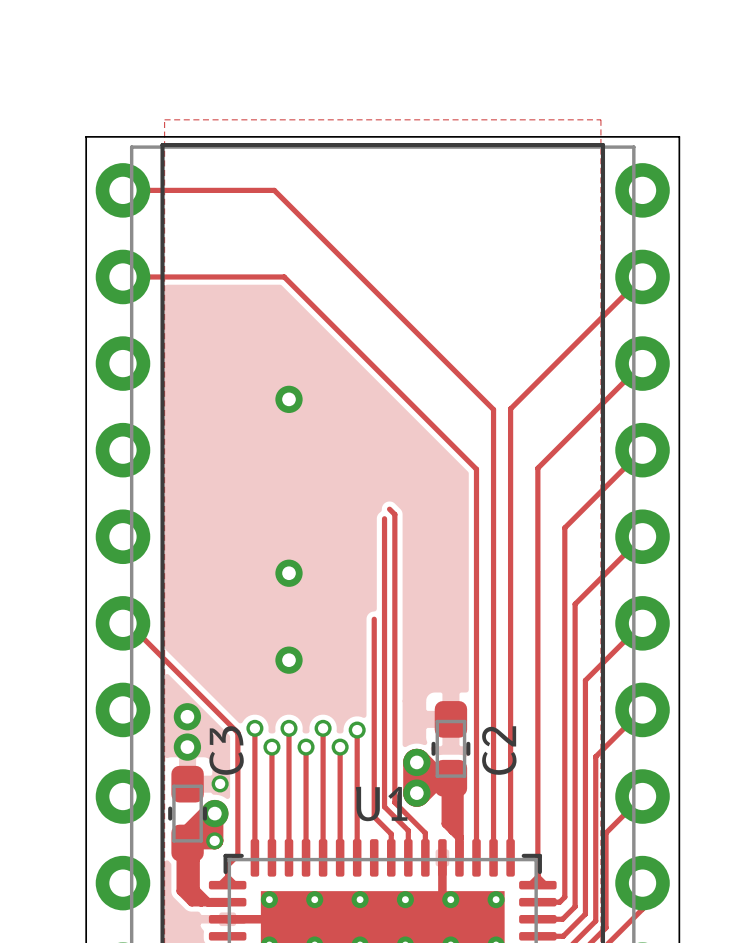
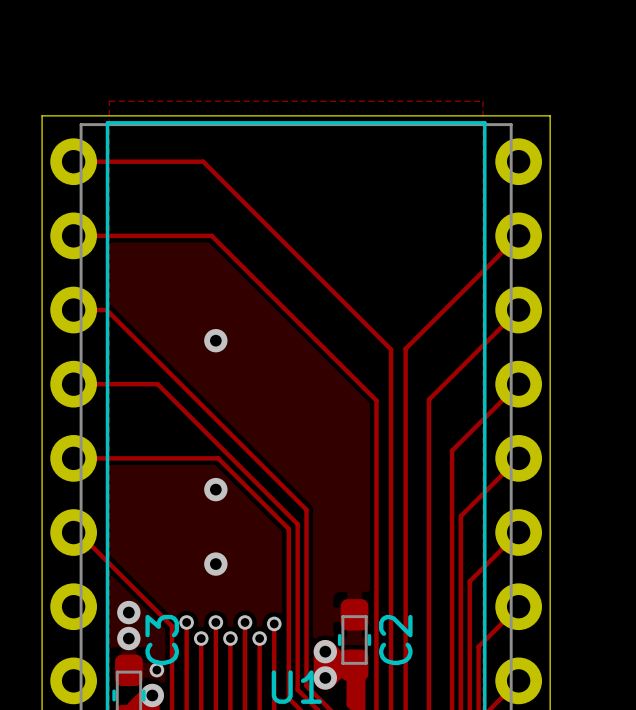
track: (389, 509) (394, 514) (394, 596) -> (73, 310) (106, 310) (306, 509)
track: (384, 518) (384, 613) -> (73, 384) (157, 384) (297, 524)
track: none -> (73, 458) (218, 458) (288, 529)

